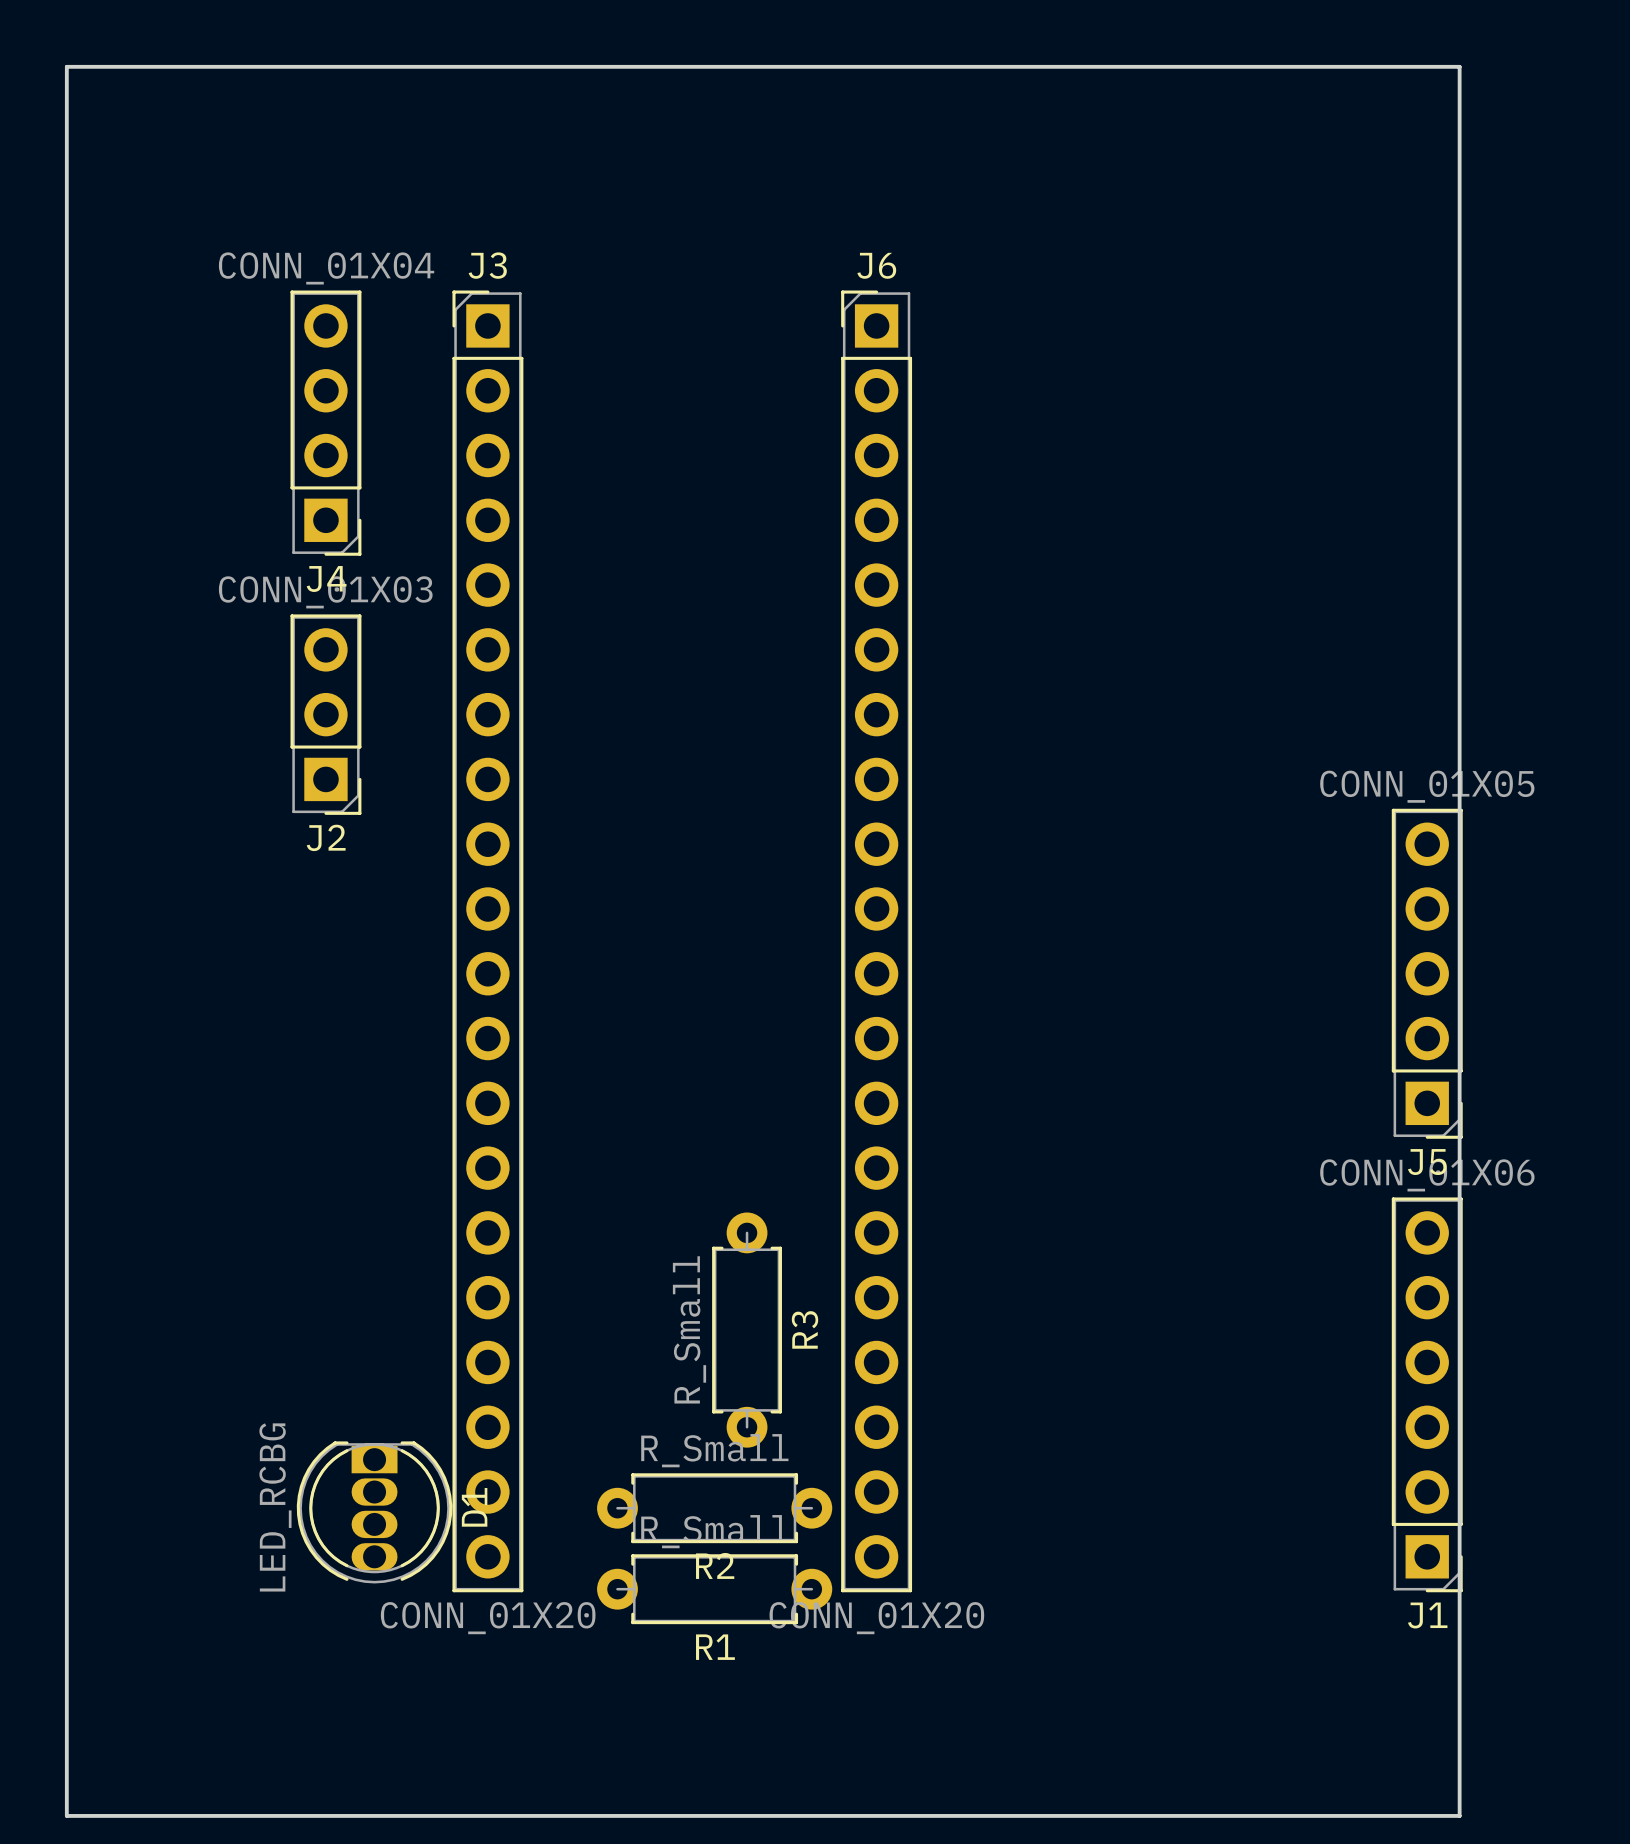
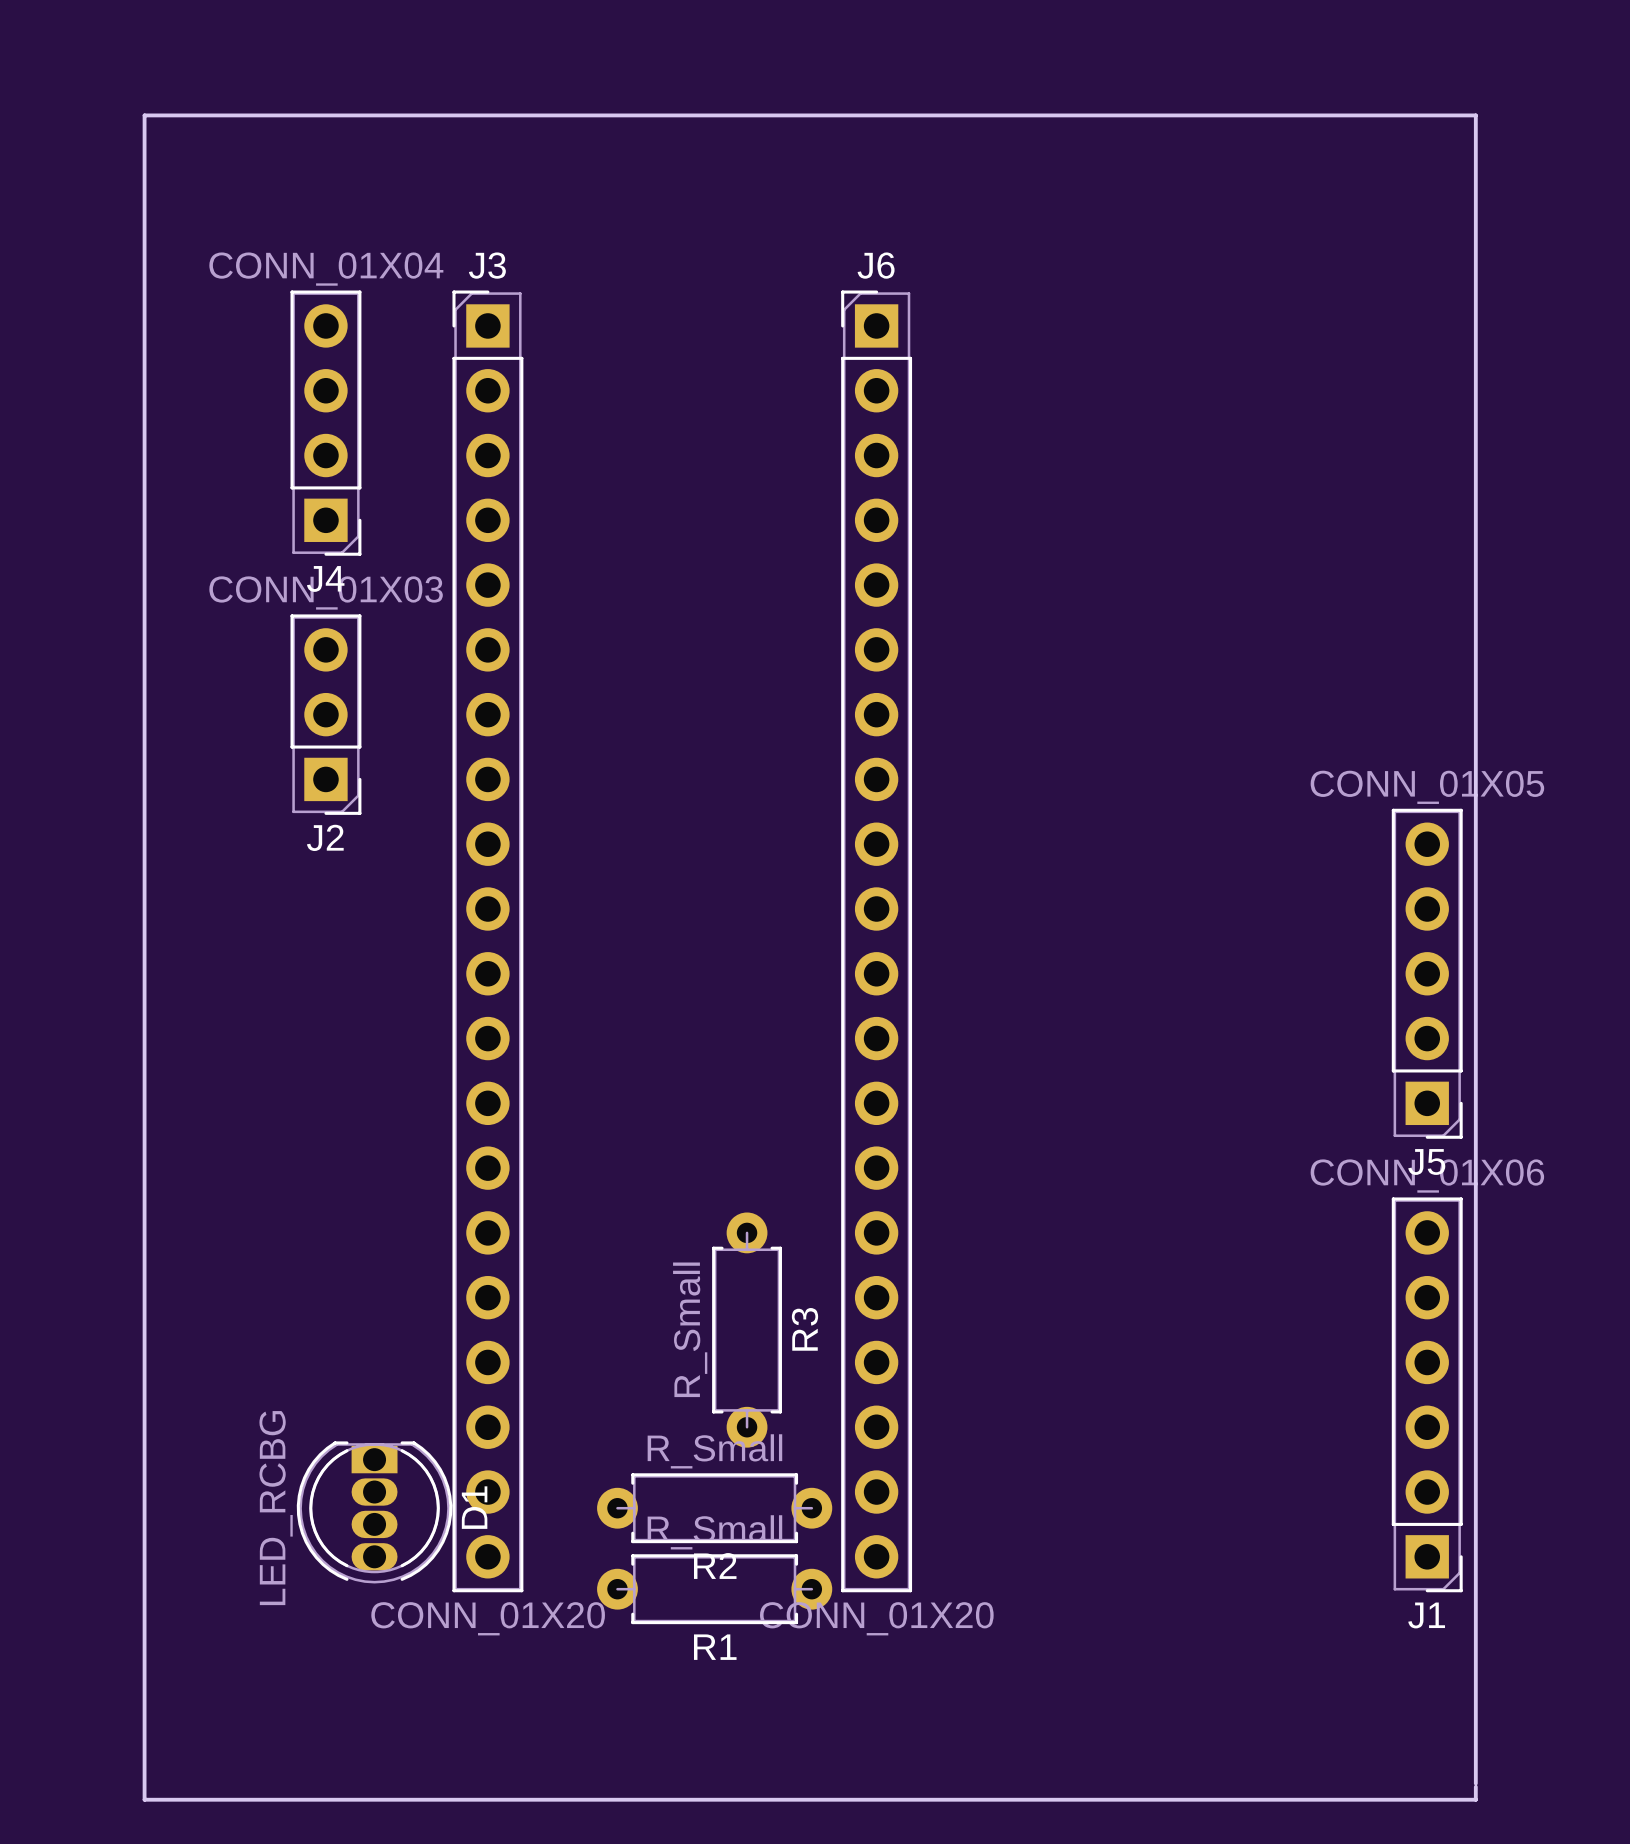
board edge: (66, 66) (1459, 66) (1459, 1815) (66, 1815) (66, 66) -> none
board edge: none -> (1475, 1783) (1475, 115) (144, 115) (144, 1799) (1475, 1799) (1475, 1786)

